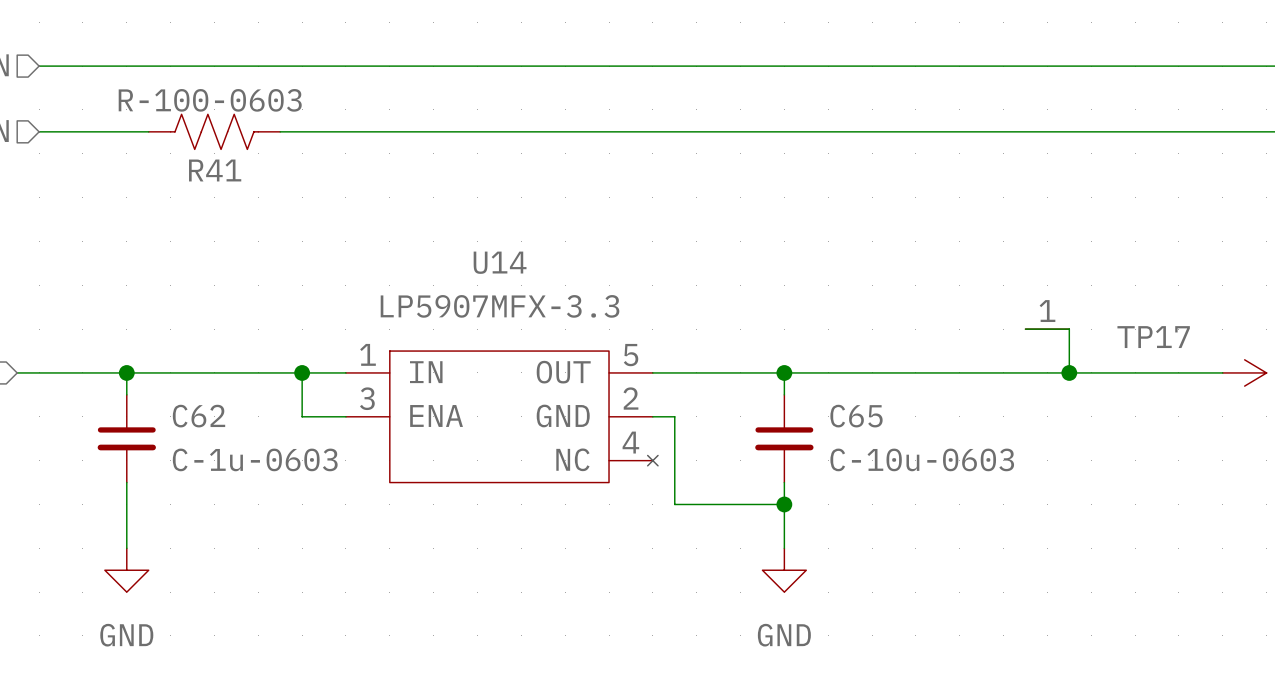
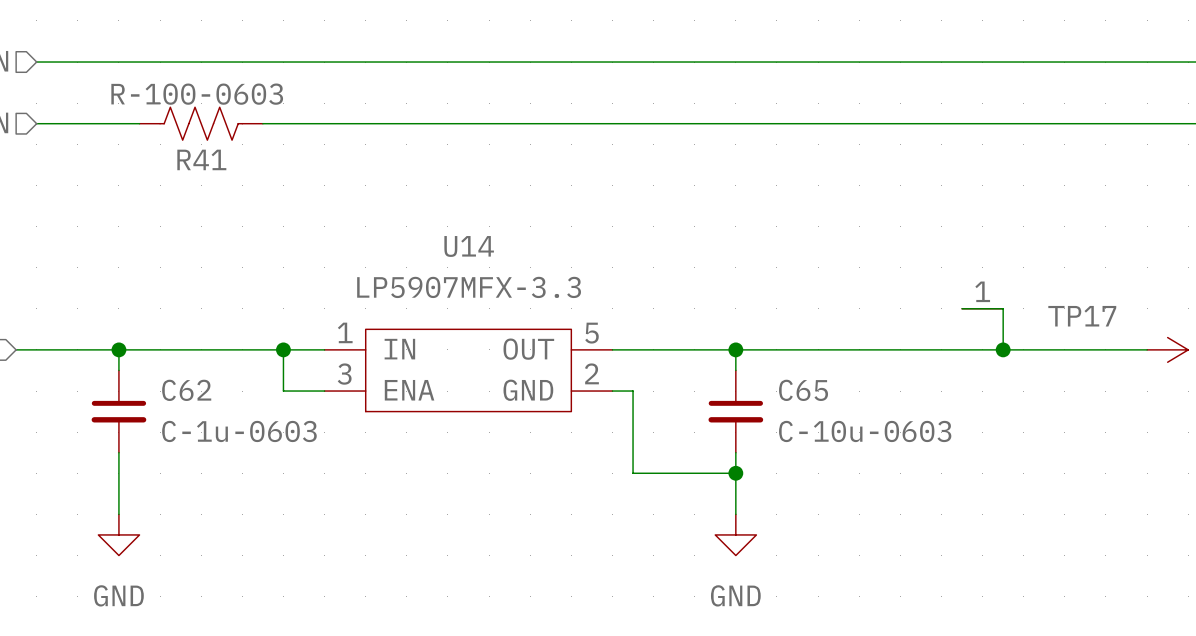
U14 symbol: [345, 351, 659, 483] -> [324, 329, 613, 412]

